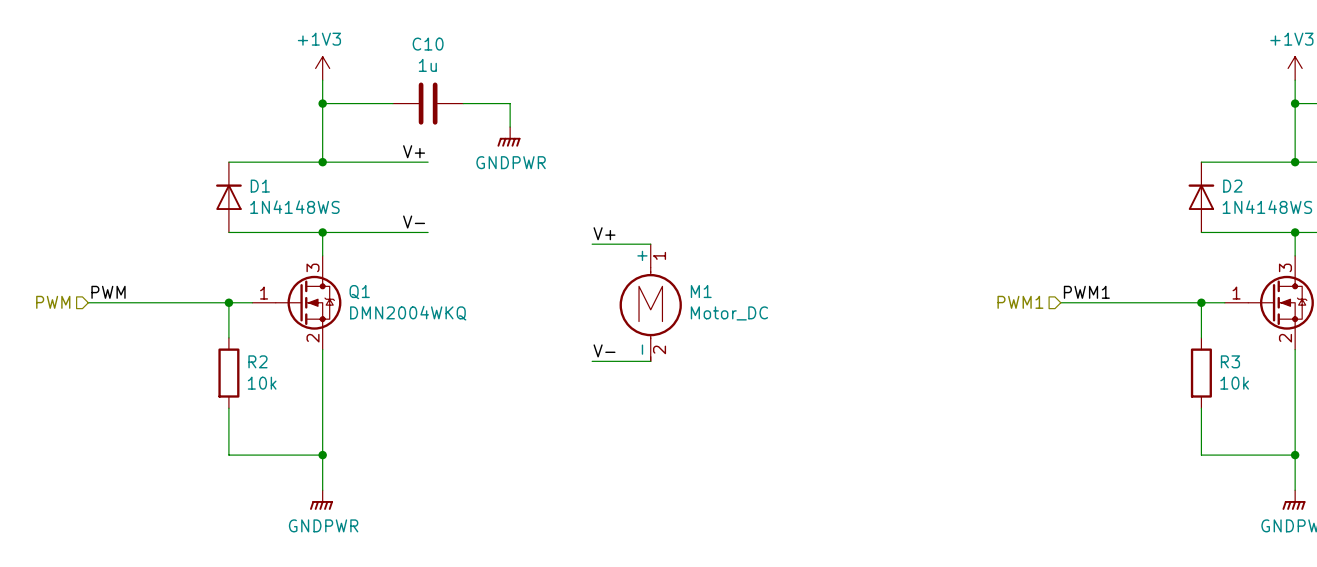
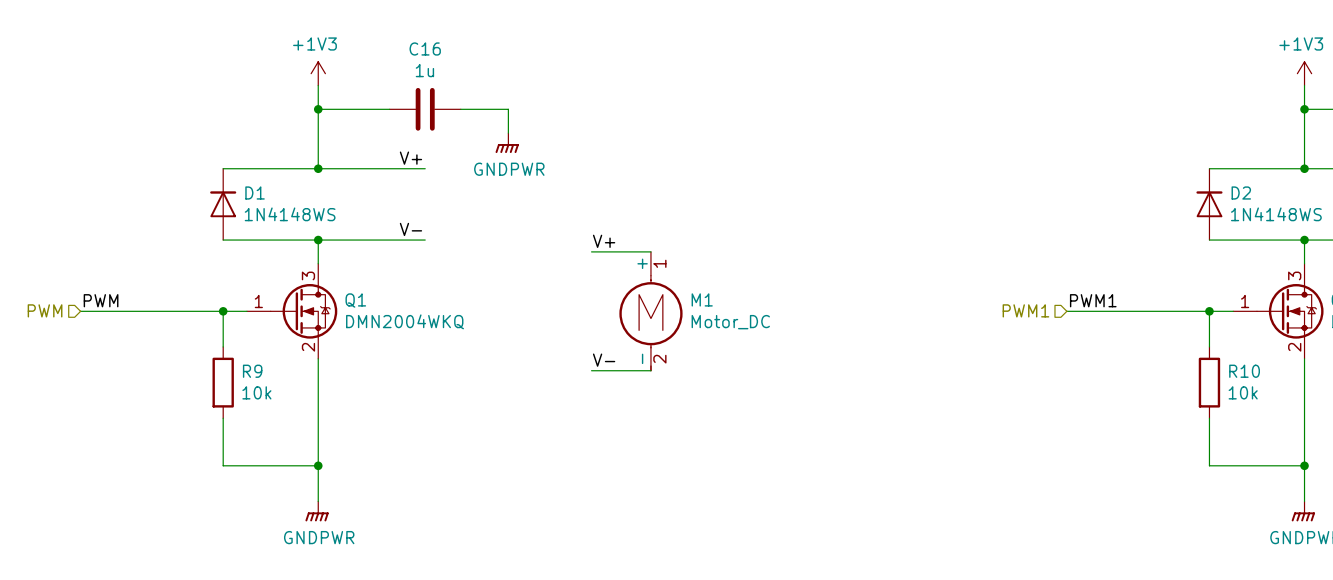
C10 name: C10 (428, 44) -> C16 (425, 48)
R2 name: R2 (257, 361) -> R9 (252, 371)
R3 name: R3 (1230, 361) -> R10 (1244, 371)

